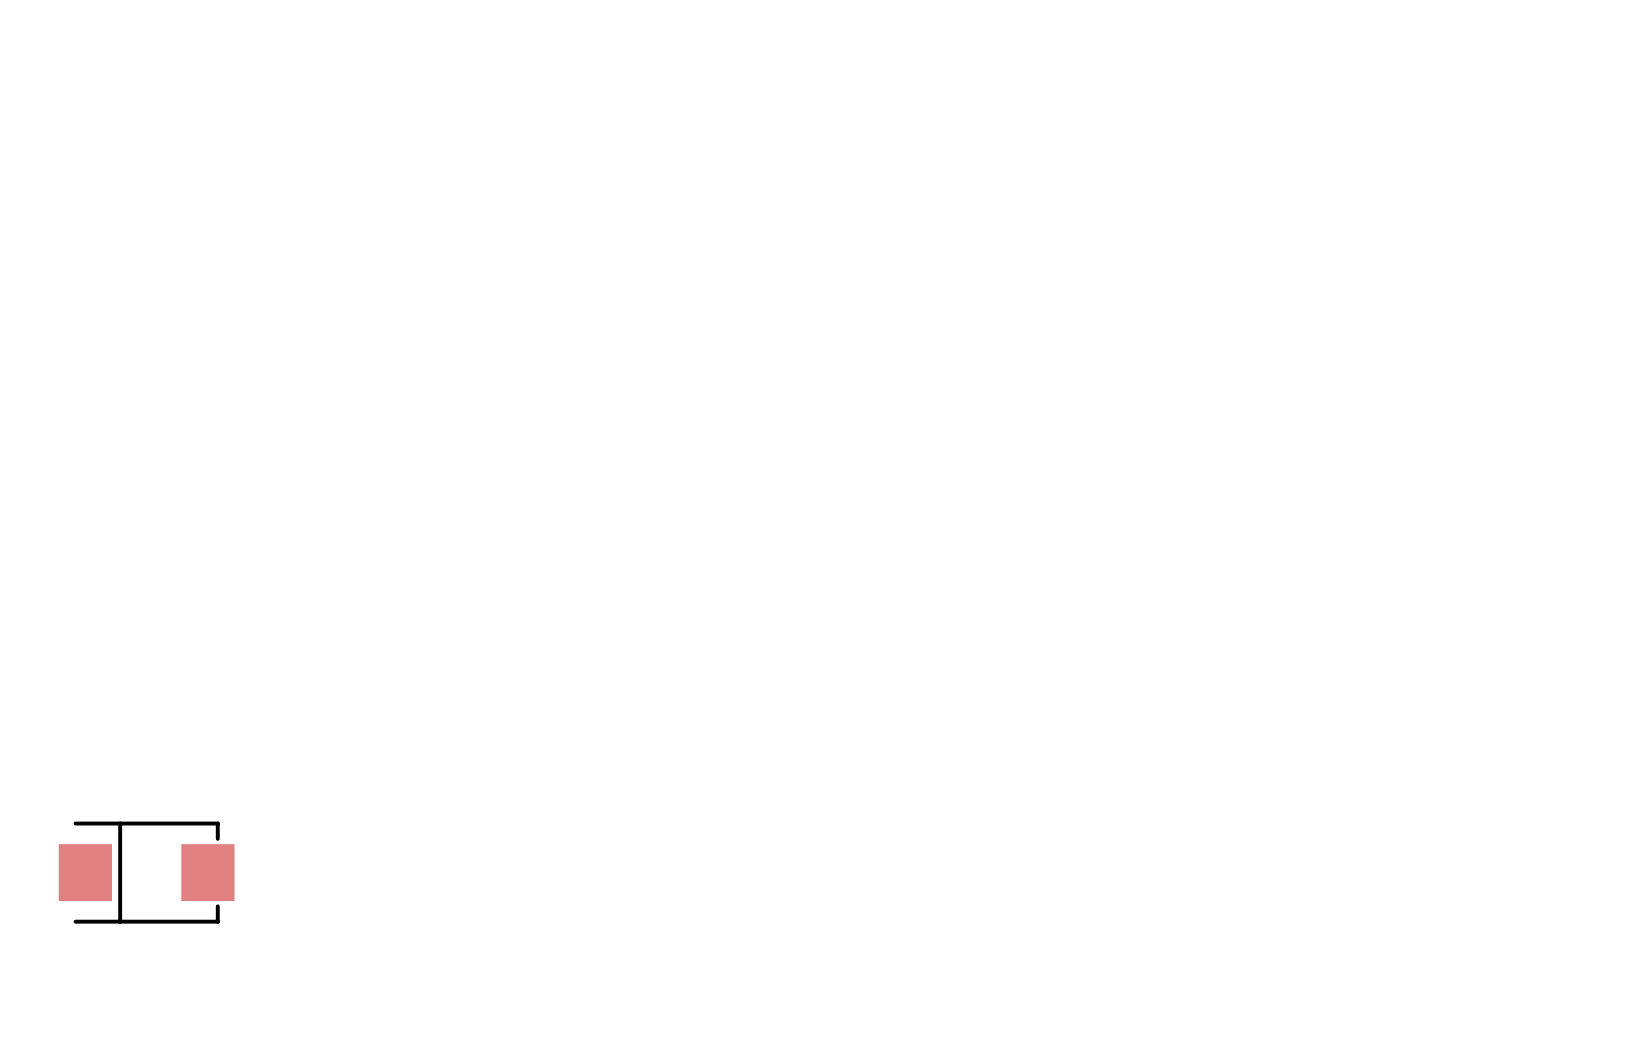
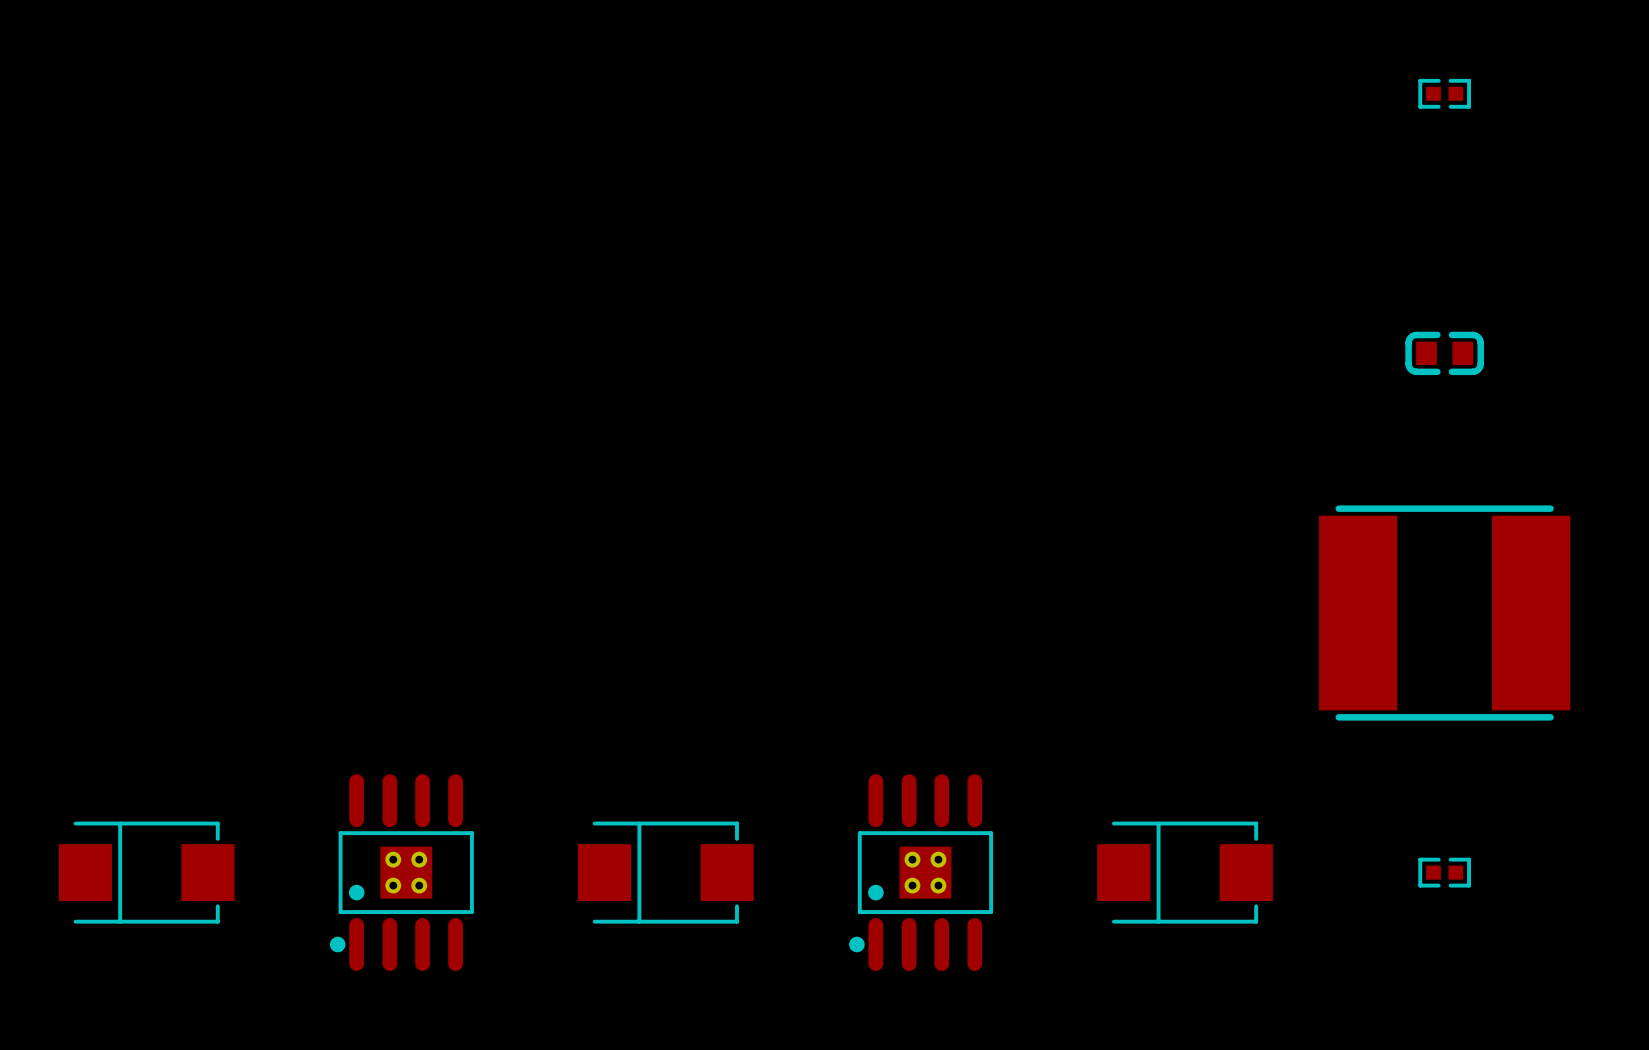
part: none -> (1444, 93)
part: none -> (1444, 353)
part: none -> (1444, 613)
part: none -> (401, 872)
part: none -> (665, 872)
part: none -> (921, 872)
part: none -> (1185, 872)
part: none -> (1444, 872)

